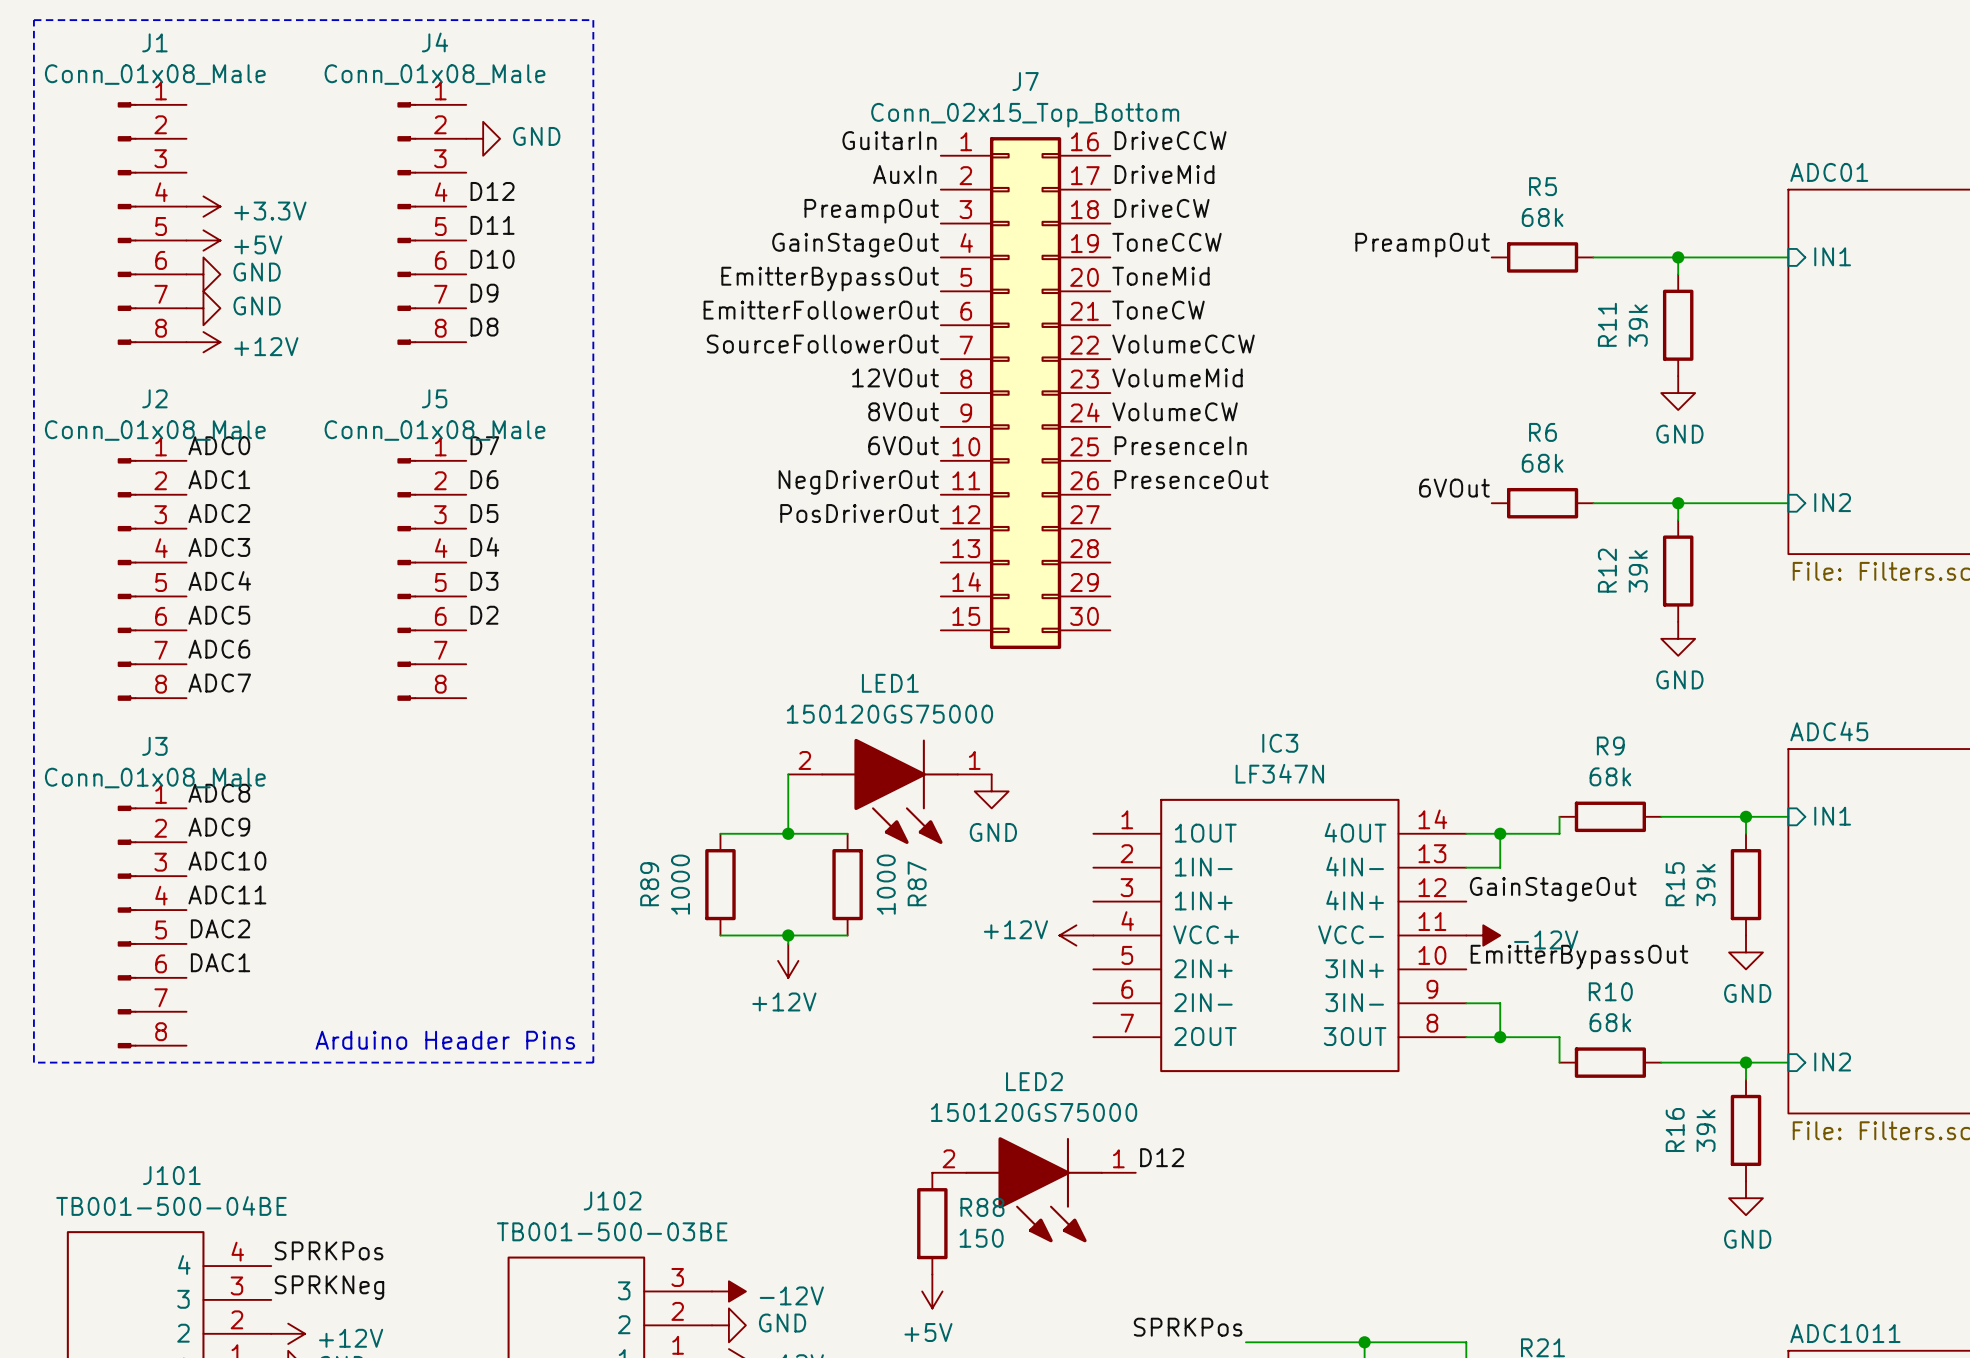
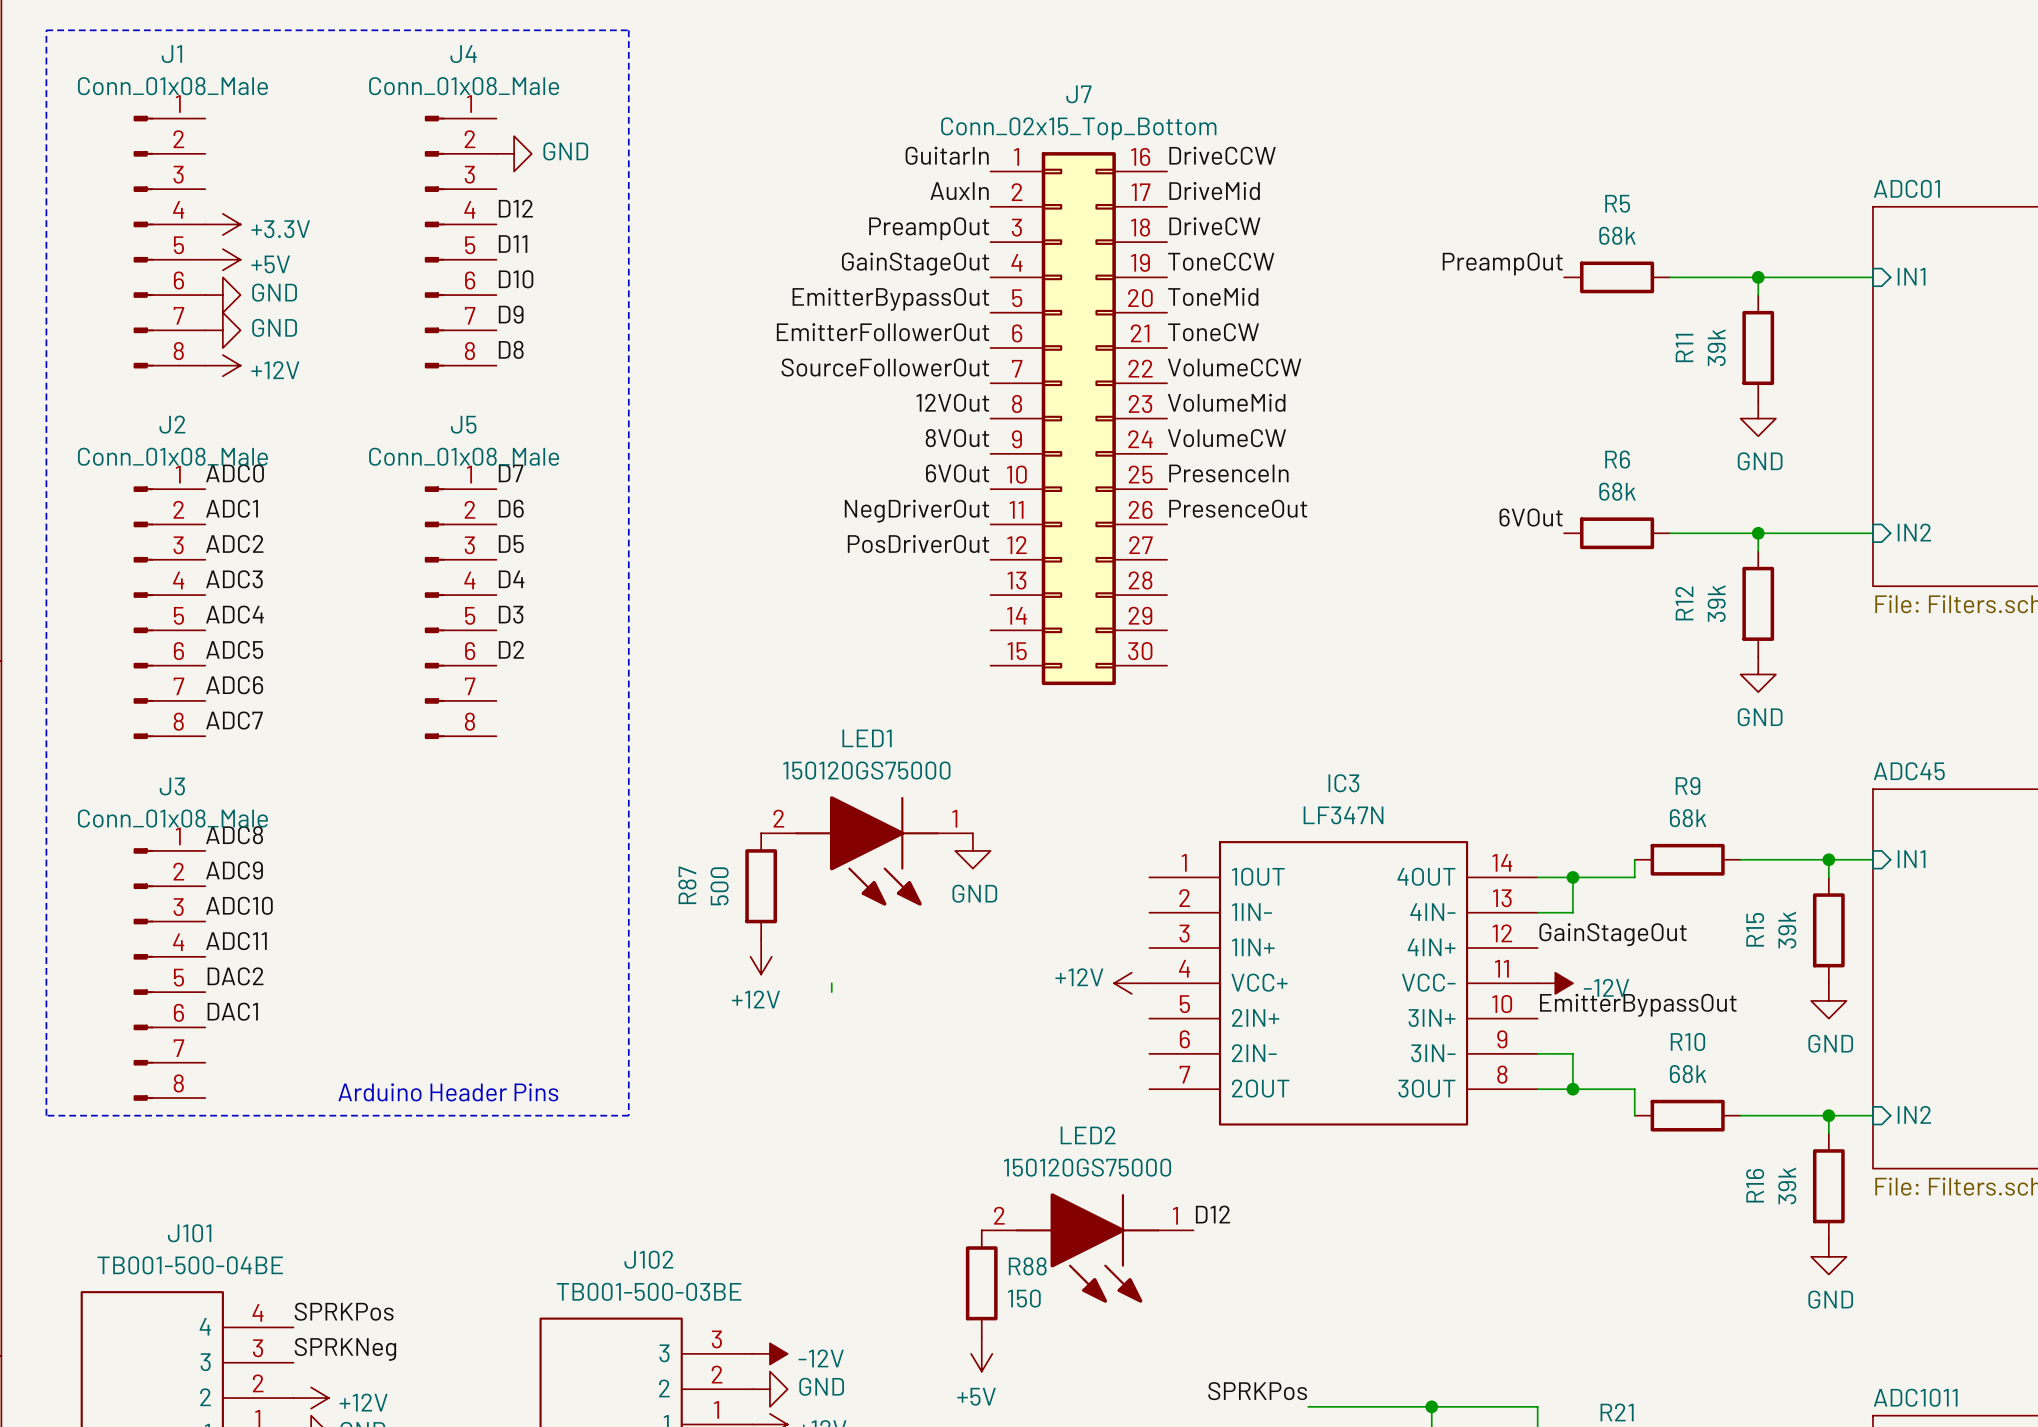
LED1 position: (889, 791) -> (867, 850)
power symbol position: GND (991, 791) -> GND (972, 850)
wire: (720, 833) (847, 833) -> none
junction: (788, 833) -> none
R87 name position: R87 (917, 883) -> R87 (687, 885)
R89: 1000 (720, 884) -> none
R87 position: (847, 884) -> (761, 886)
R87 value: 1000 (886, 884) -> 500 (719, 886)
wire: (720, 935) (847, 935) -> none
junction: (788, 935) -> none
power symbol position: +12V (788, 960) -> +12V (761, 956)

